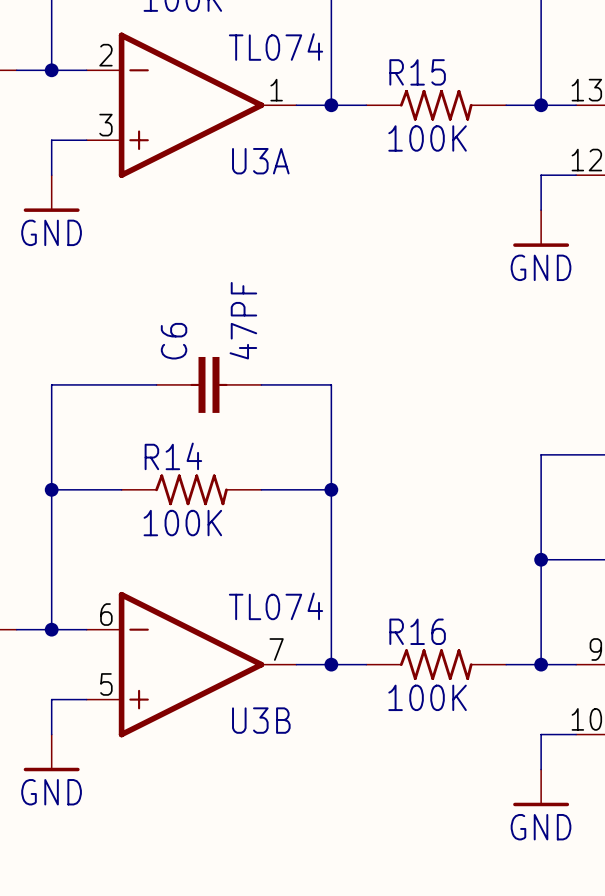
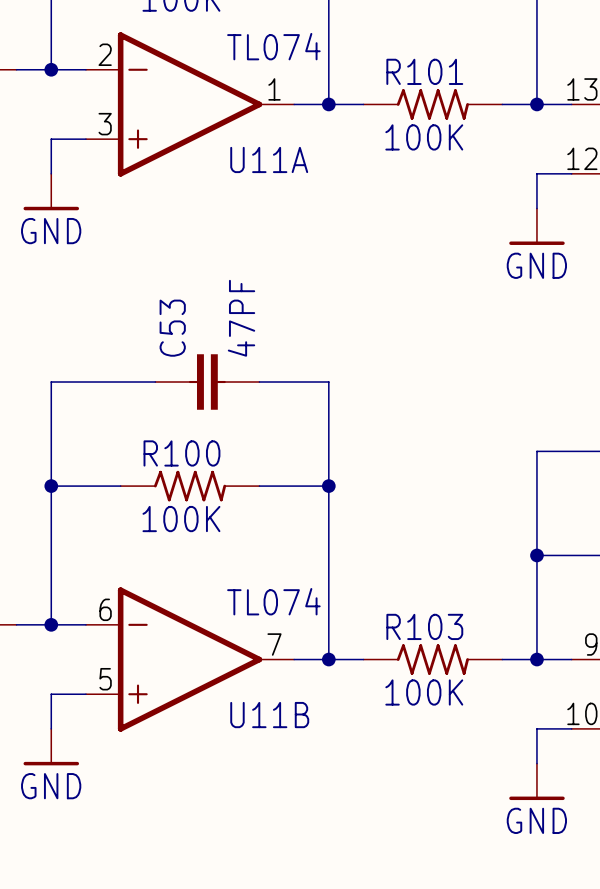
R15 name: R15 (417, 72) -> R101 (424, 71)
U3A name: U3A (260, 161) -> U11A (269, 159)
C6 name: C6 (174, 341) -> C53 (172, 328)
R14 name: R14 (173, 456) -> R100 (181, 453)
R16 name: R16 (417, 631) -> R103 (424, 626)
U3B name: U3B (261, 720) -> U11B (269, 715)

